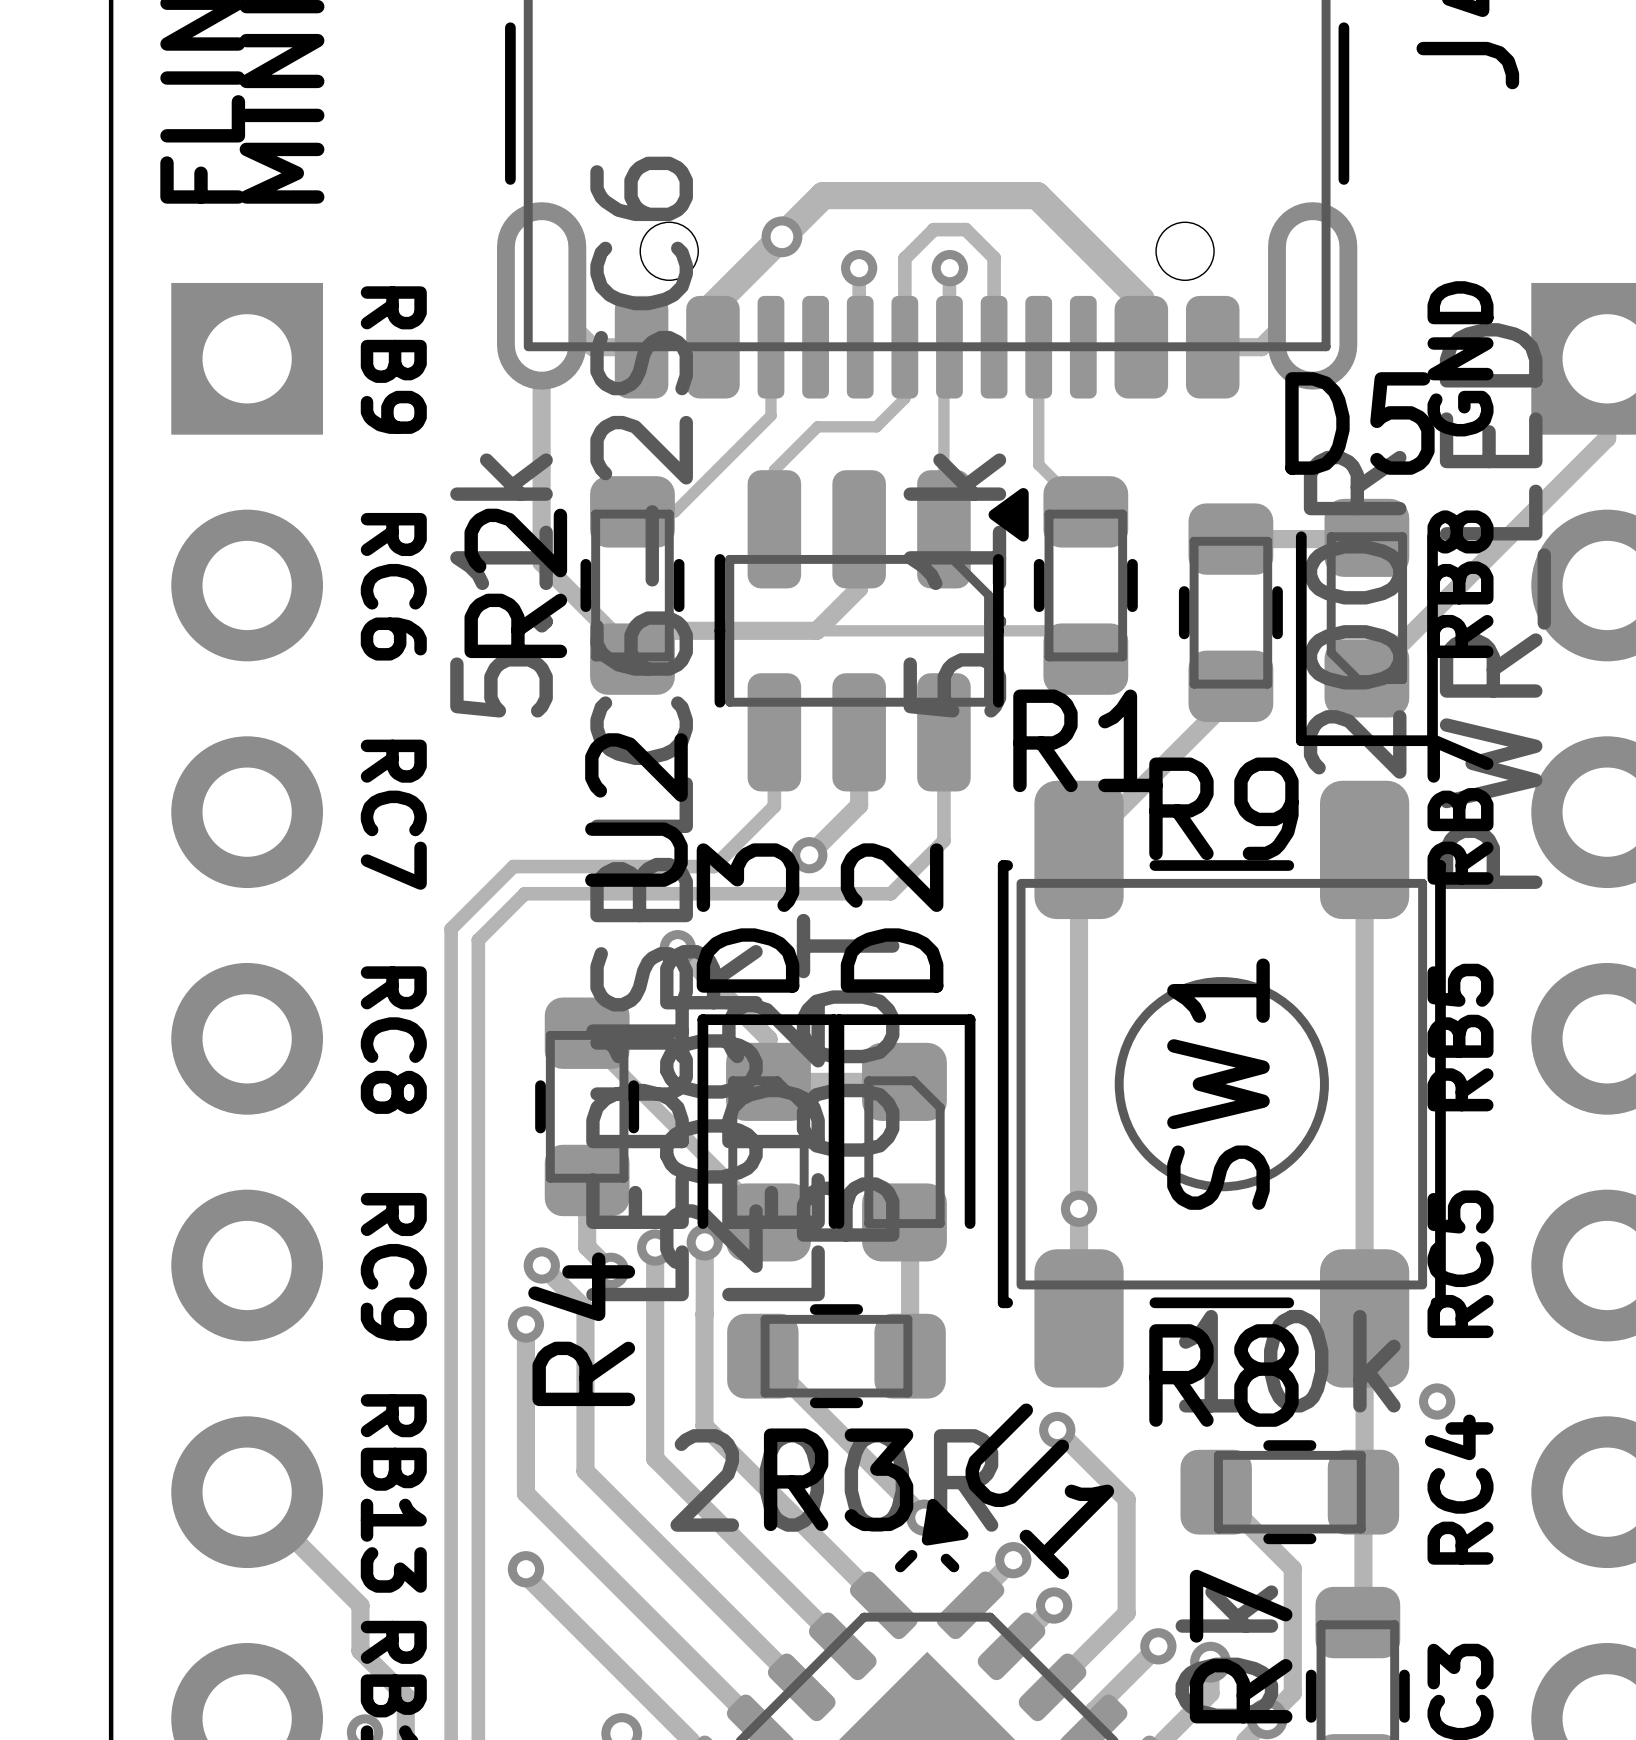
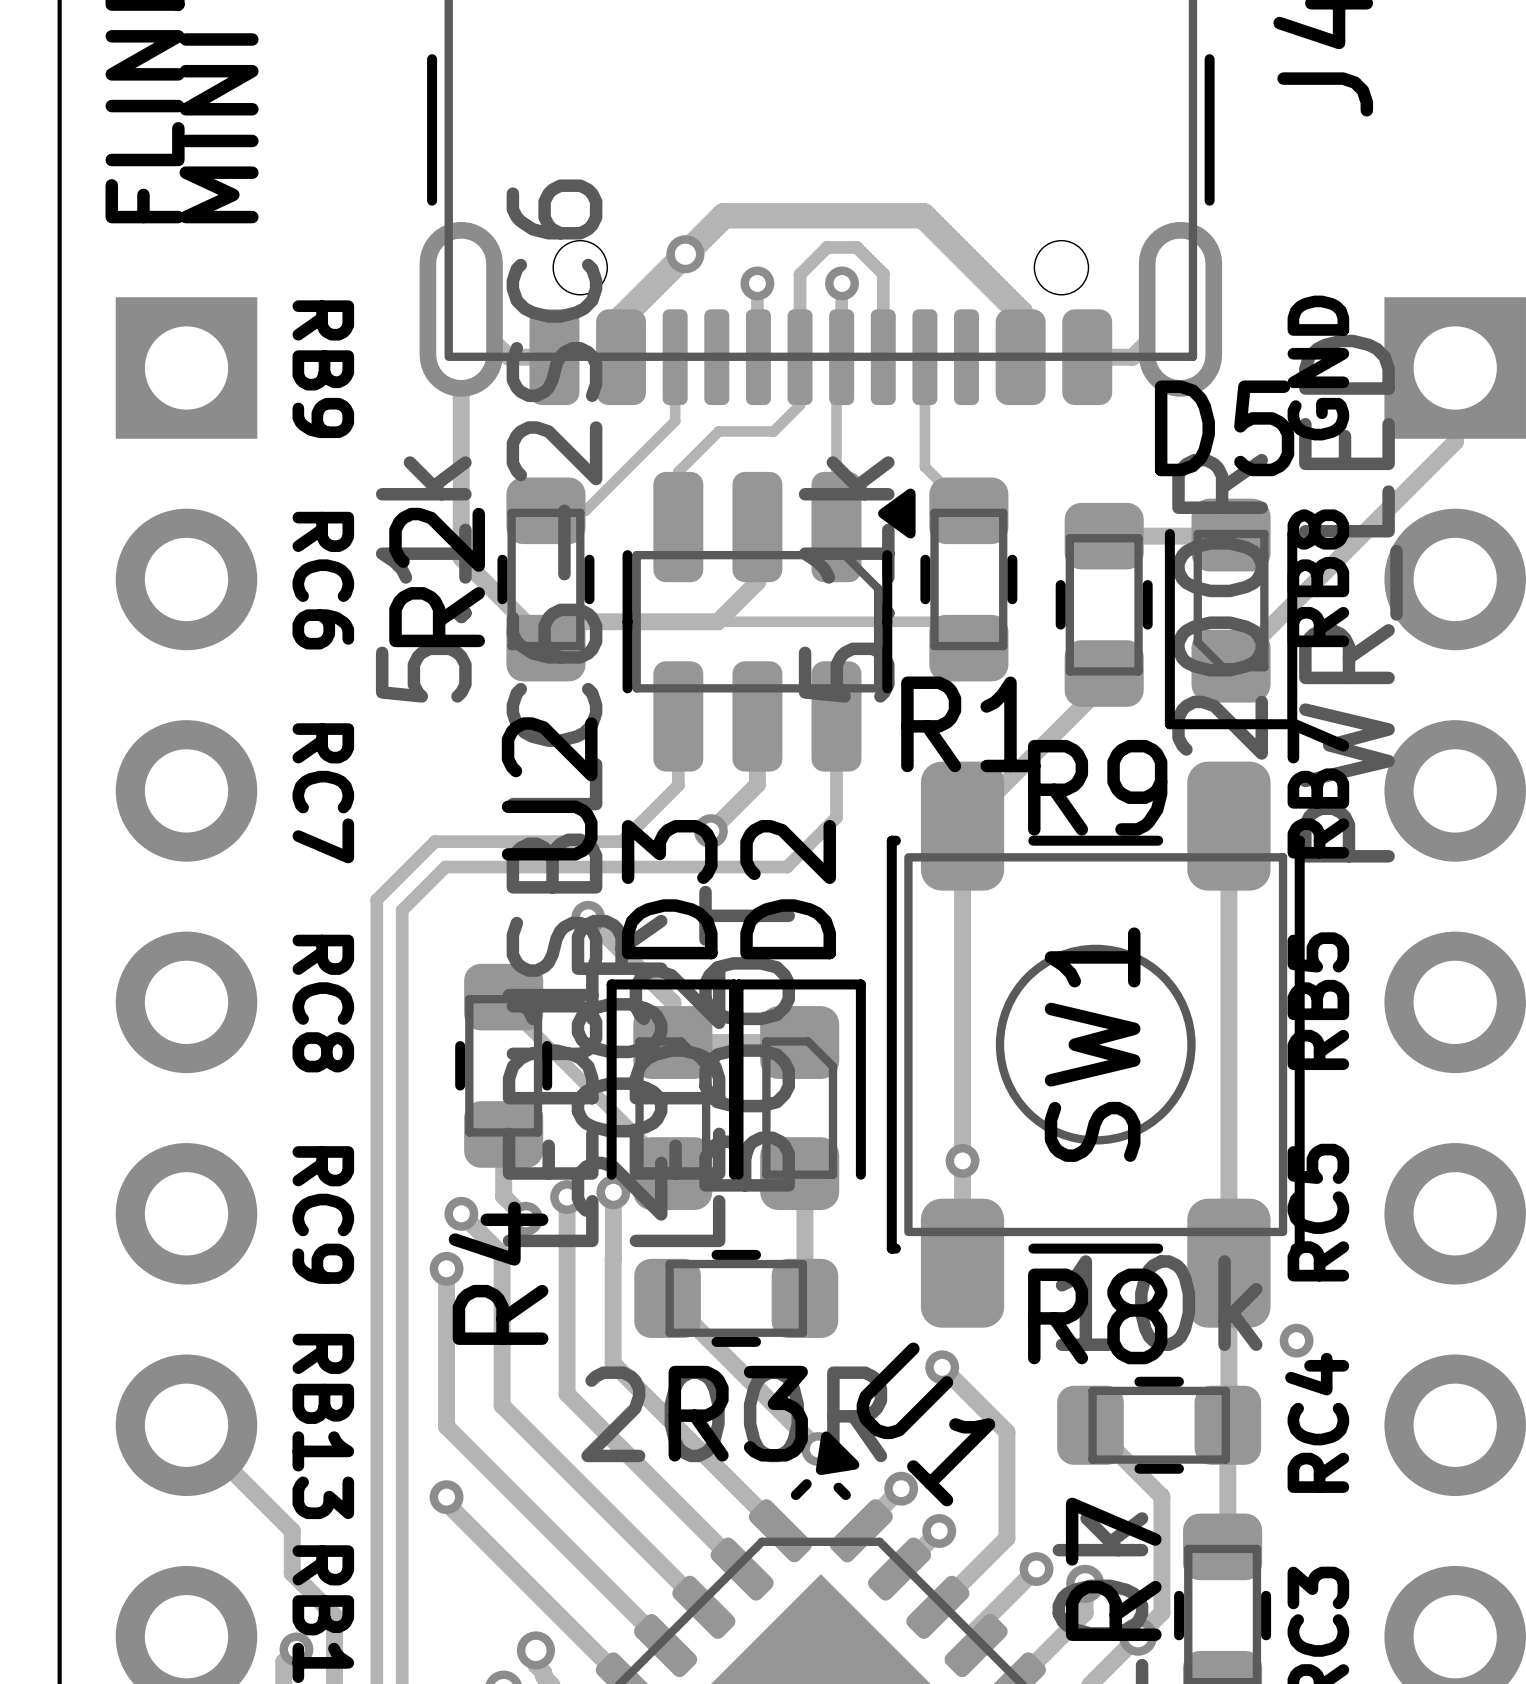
D3 name position: D3 (748, 918) -> D3 (669, 889)

